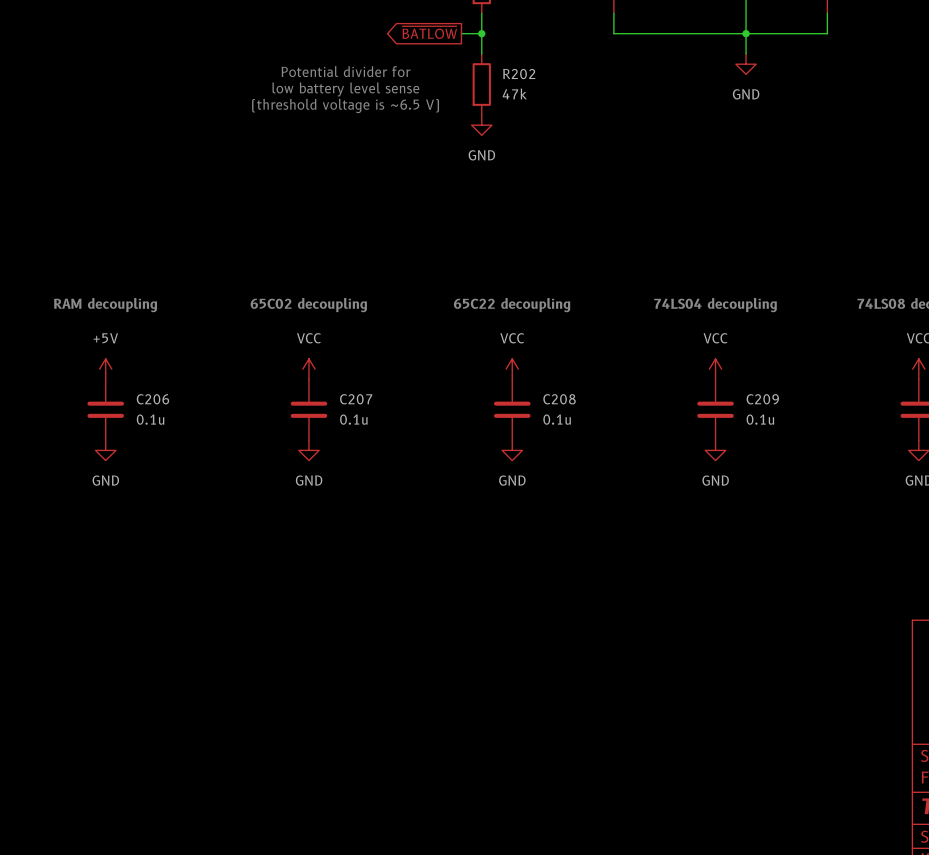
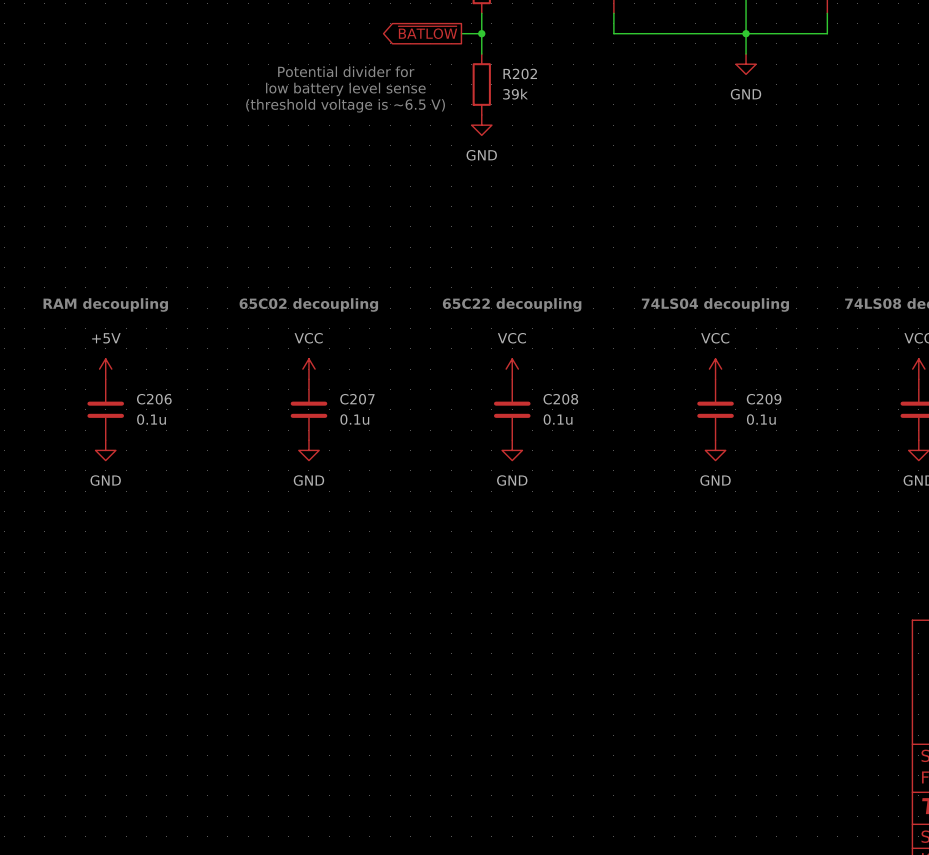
R202 value: 47k (514, 93) -> 39k (515, 94)

